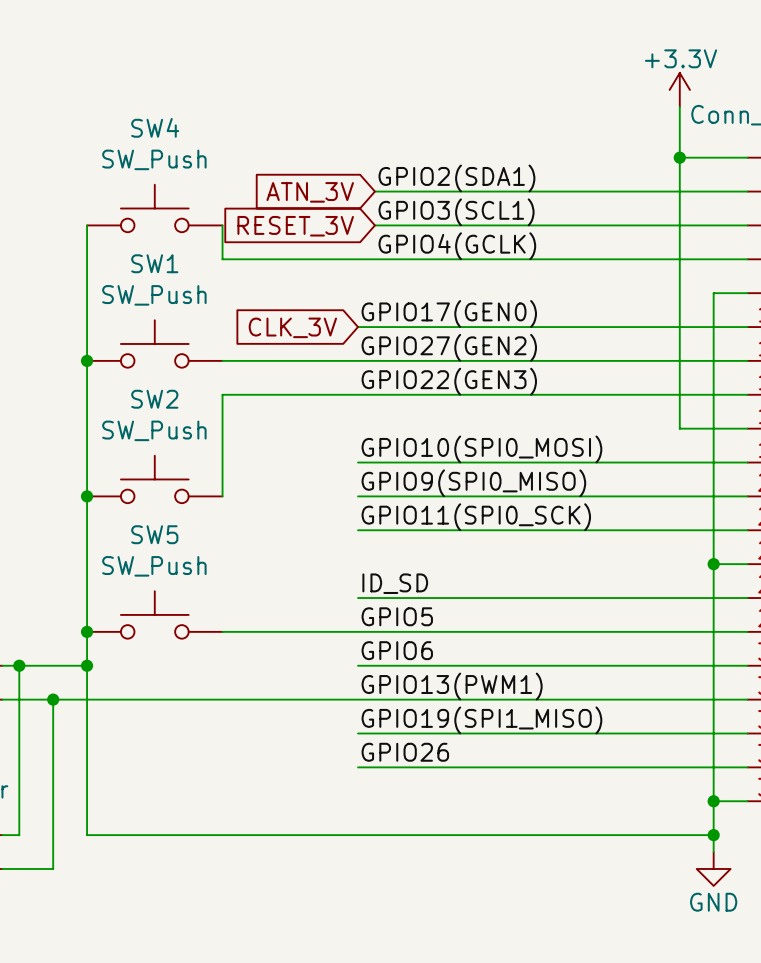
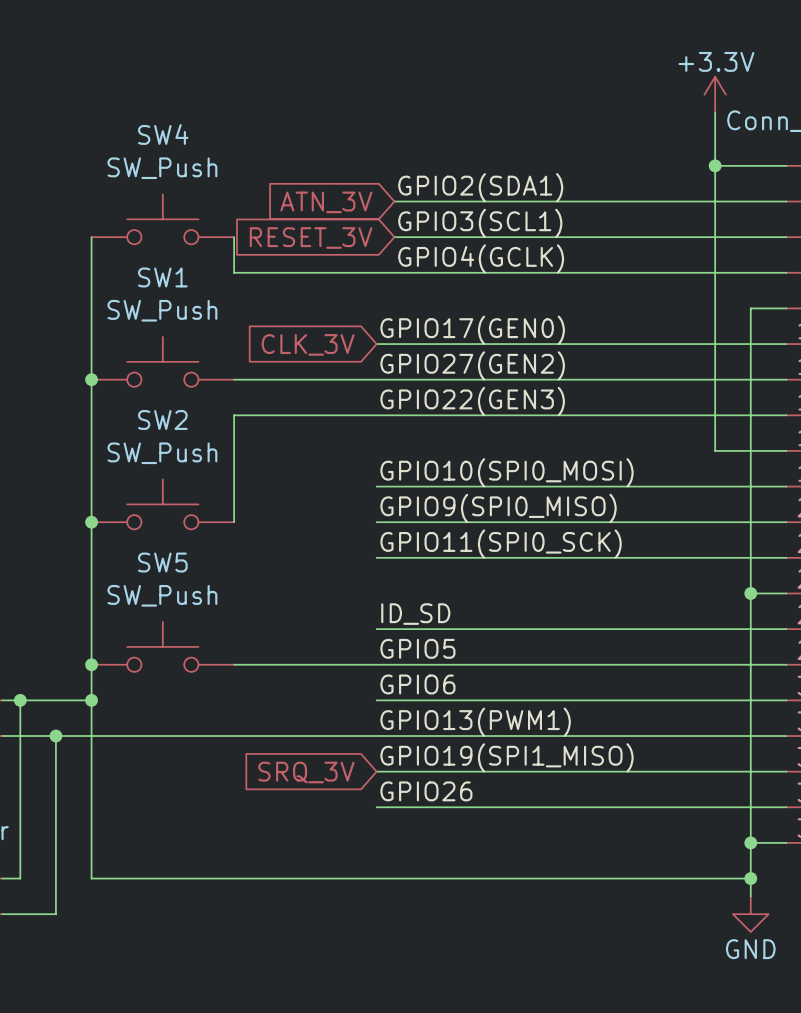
global label: none -> SRQ_3V (306, 772)

